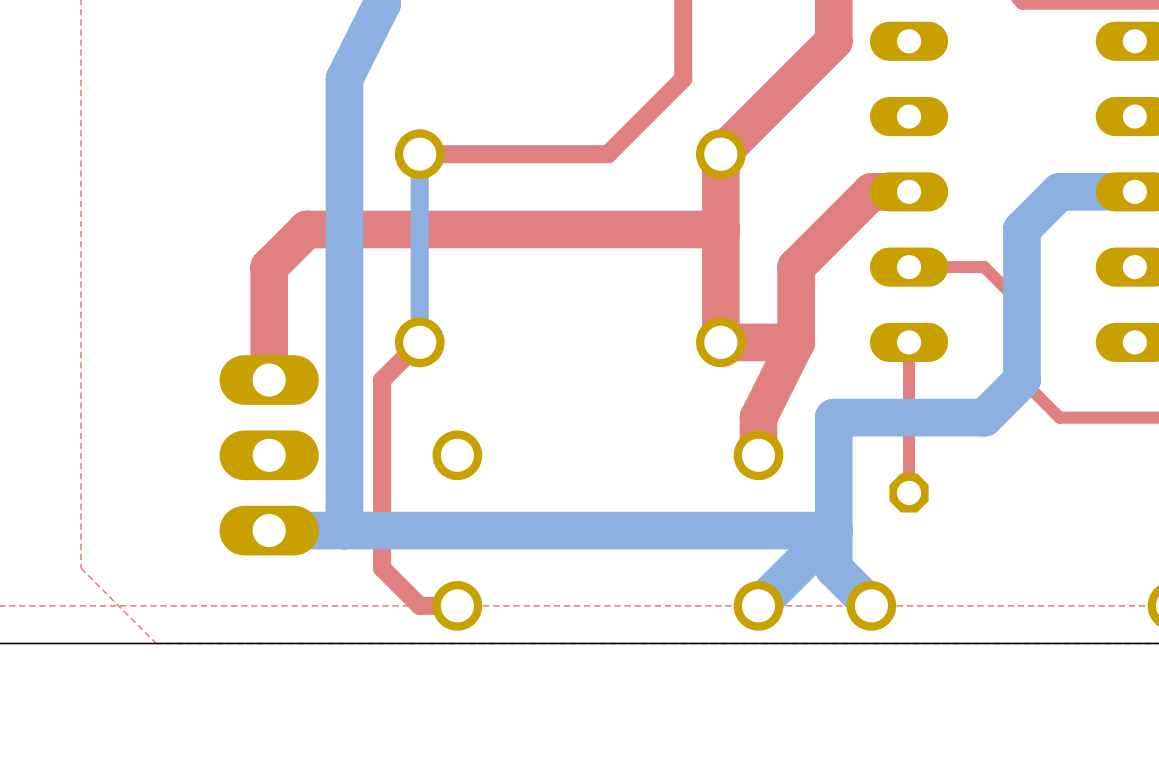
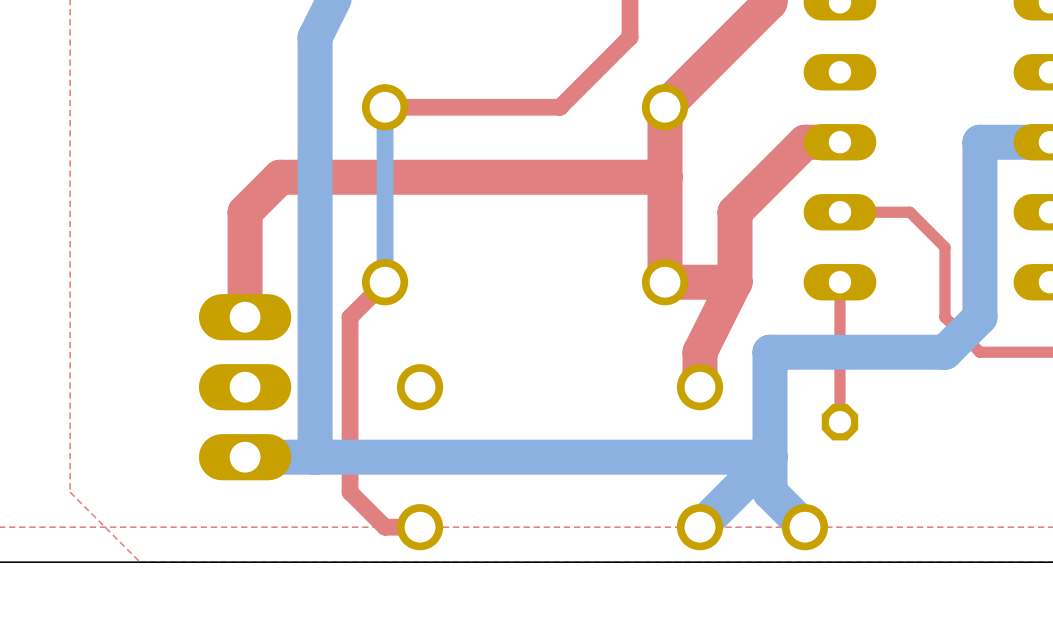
bottom track: (1059, 191) (1021, 229) (1021, 380) (984, 417) -> (979, 142) (979, 317) (944, 352) (909, 352)

